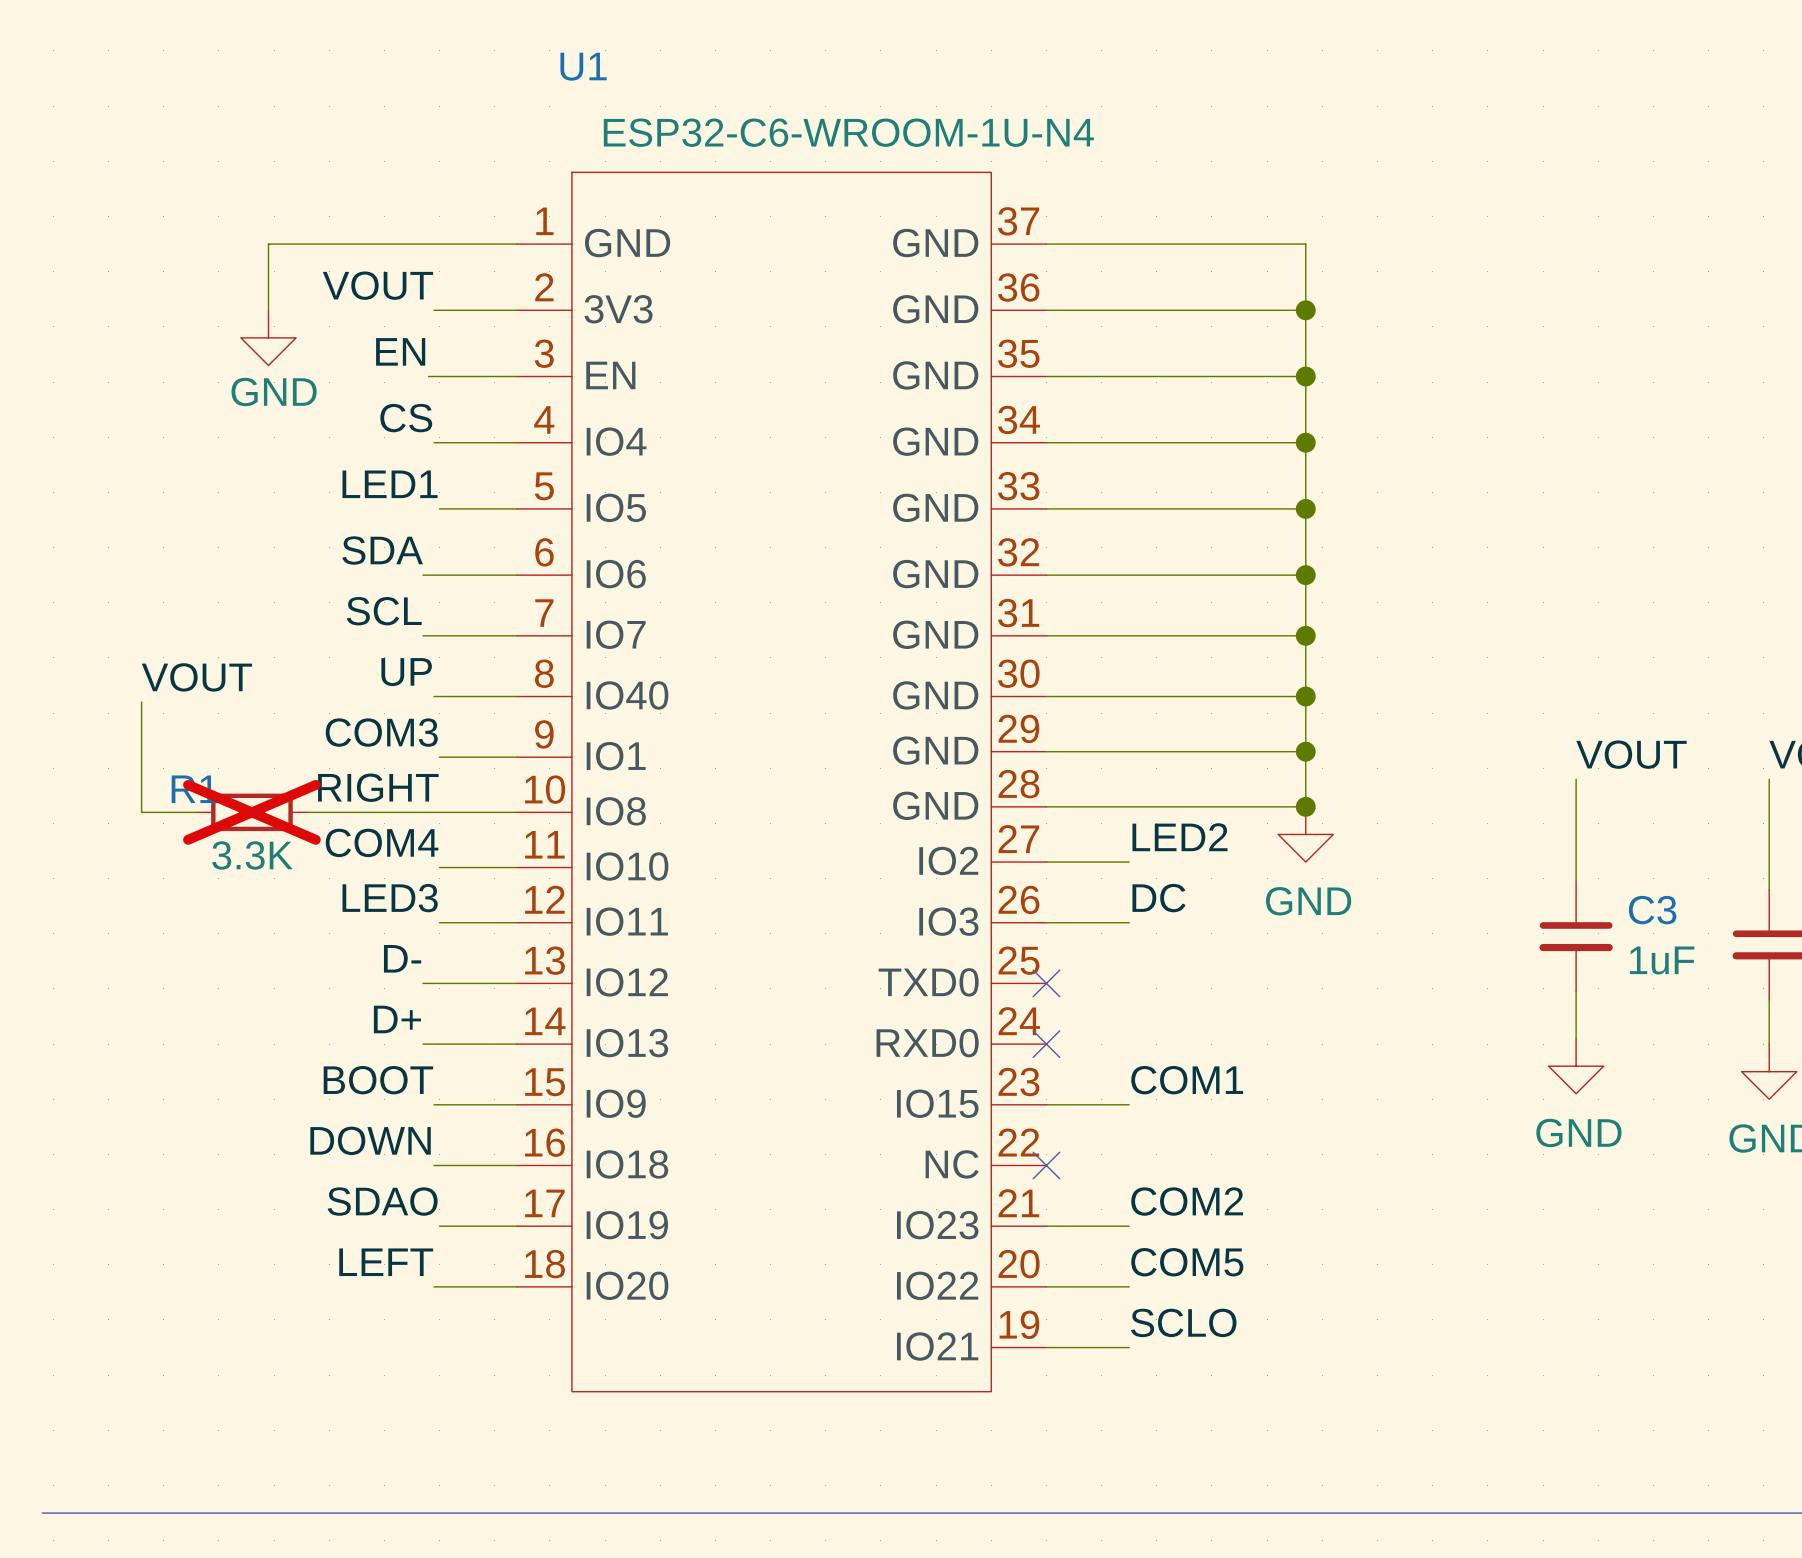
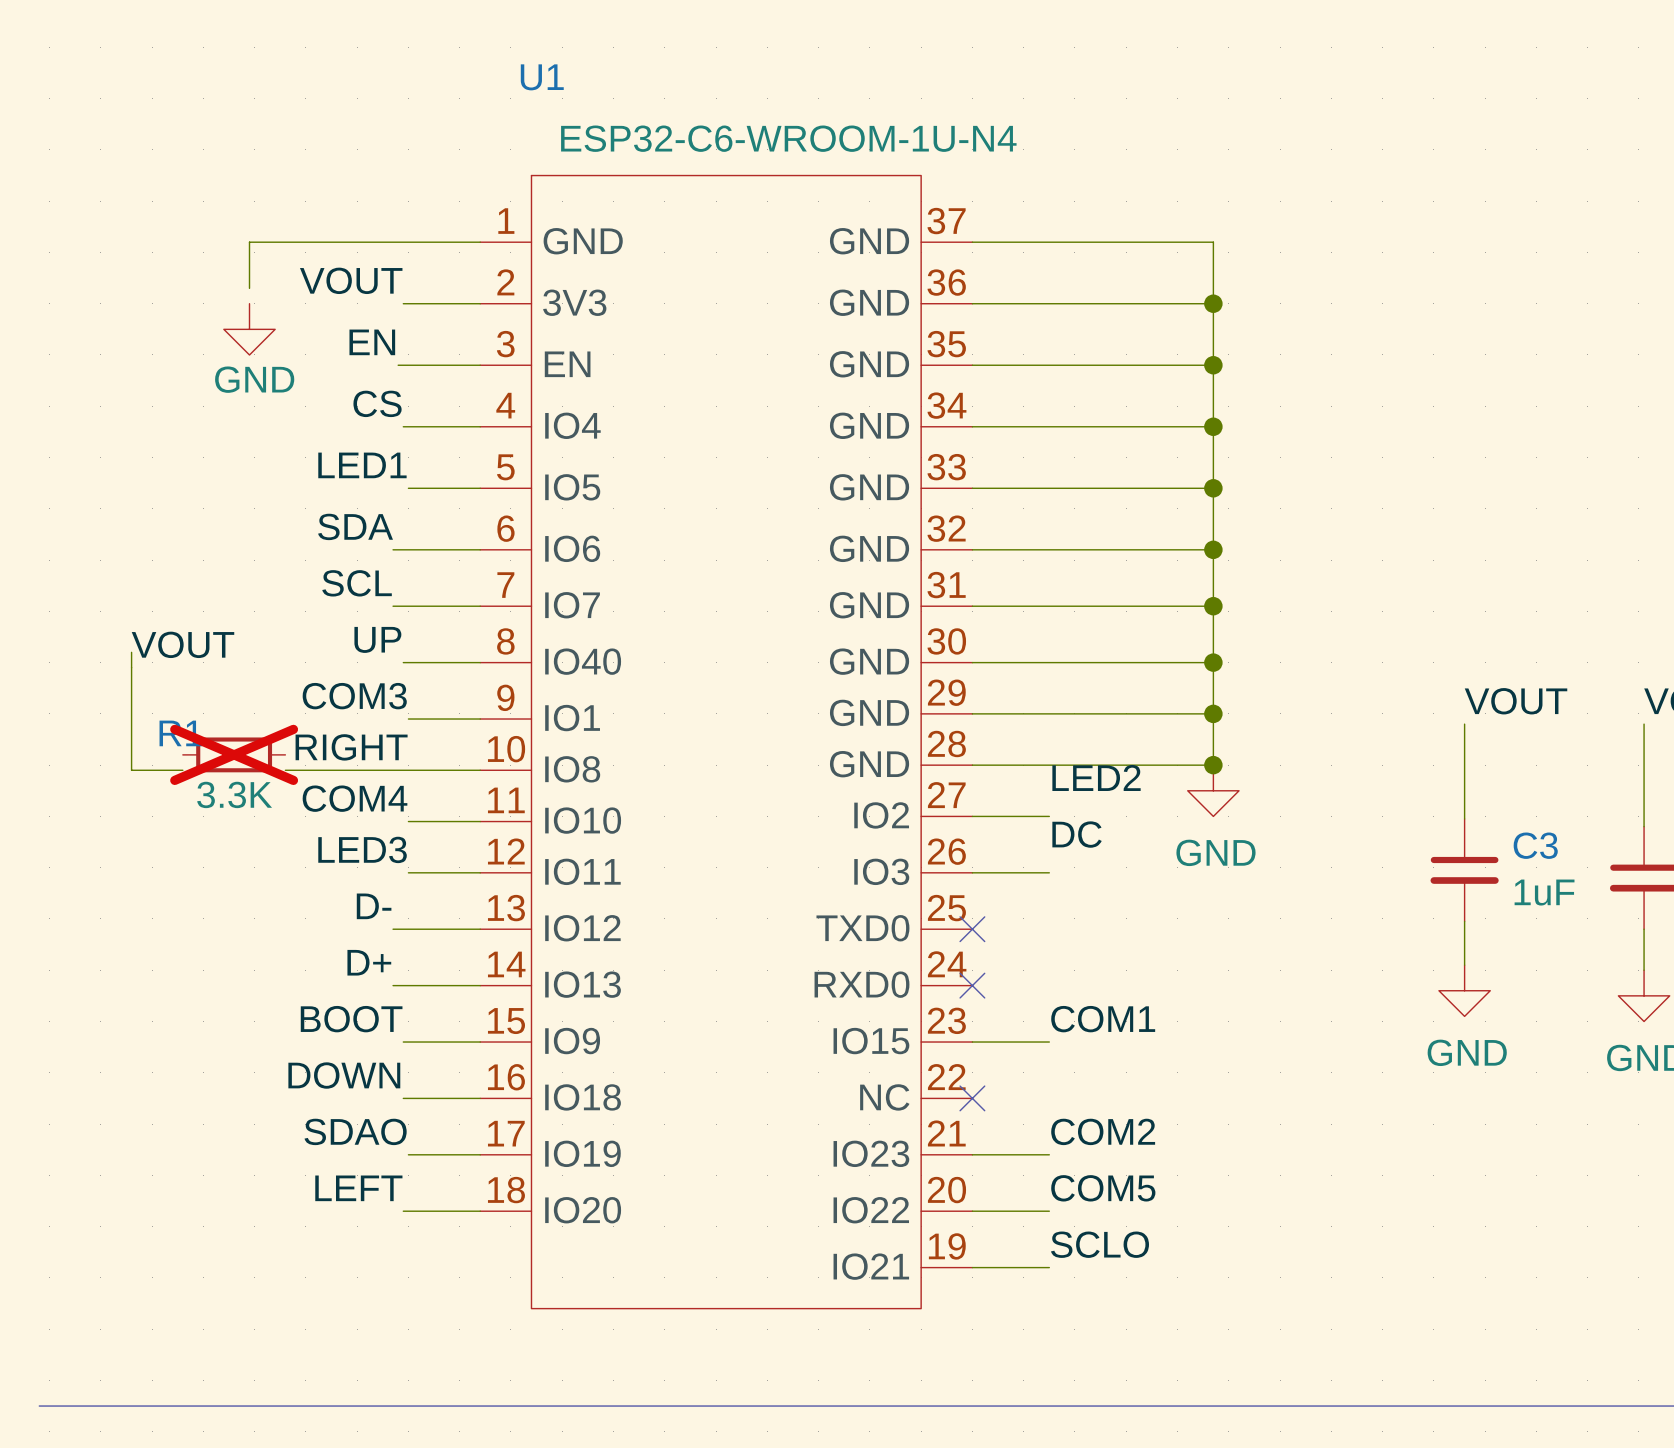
wire: (516, 244) (268, 244) (268, 260) -> (480, 242) (249, 242)
wire: (1046, 244) (1305, 244) (1305, 260) -> (972, 242) (1213, 242)
label position: VOUT (377, 285) -> VOUT (351, 280)
wire: (434, 310) (516, 310) -> (403, 303) (480, 303)
wire: (1046, 310) (1305, 310) -> (972, 303) (1213, 303)
junction position: (1305, 310) -> (1213, 303)
power symbol position: GND (268, 337) -> GND (249, 329)
label position: EN (400, 351) -> EN (372, 342)
wire: (428, 376) (516, 376) -> (398, 365) (480, 365)
wire: (1046, 376) (1305, 376) -> (972, 365) (1213, 365)
junction position: (1305, 376) -> (1213, 365)
label position: CS (406, 418) -> CS (377, 403)
wire: (434, 442) (516, 442) -> (403, 426) (480, 426)
wire: (1046, 442) (1305, 442) -> (972, 426) (1213, 426)
junction position: (1305, 442) -> (1213, 426)
label position: LED1 (390, 484) -> LED1 (362, 465)
wire: (439, 508) (516, 508) -> (408, 488) (480, 488)
wire: (1046, 508) (1305, 508) -> (972, 488) (1213, 488)
junction position: (1305, 508) -> (1213, 488)
label position: SDA (382, 550) -> SDA (355, 526)
wire: (422, 575) (516, 575) -> (393, 549) (480, 549)
wire: (1046, 575) (1305, 575) -> (972, 549) (1213, 549)
junction position: (1305, 575) -> (1213, 549)
label position: SCL (384, 611) -> SCL (357, 583)
wire: (422, 635) (516, 635) -> (393, 606) (480, 606)
wire: (1046, 635) (1305, 635) -> (972, 606) (1213, 606)
junction position: (1305, 635) -> (1213, 606)
label position: UP (406, 672) -> UP (377, 639)
label position: VOUT (196, 677) -> VOUT (182, 644)
wire: (434, 696) (516, 696) -> (403, 662) (480, 662)
wire: (1046, 696) (1305, 696) -> (972, 662) (1213, 662)
junction position: (1305, 696) -> (1213, 662)
label position: COM3 (381, 732) -> COM3 (354, 696)
wire: (1046, 751) (1305, 751) -> (972, 713) (1213, 713)
junction position: (1305, 751) -> (1213, 713)
wire: (439, 757) (516, 757) -> (408, 719) (480, 719)
U1 position: (781, 782) -> (726, 742)
label position: RIGHT (378, 787) -> RIGHT (351, 747)
wire: (1046, 806) (1305, 806) -> (972, 765) (1213, 765) (1213, 749)
junction position: (1305, 806) -> (1213, 765)
wire: (141, 812) (196, 812) -> (131, 754) (131, 770) (182, 770)
wire: (307, 812) (516, 812) -> (285, 770) (480, 770)
power symbol position: GND (1305, 834) -> GND (1213, 790)
label position: COM4 (382, 842) -> COM4 (355, 798)
wire: (1046, 862) (1129, 862) -> (972, 816) (1049, 816)
wire: (439, 867) (516, 867) -> (408, 821) (480, 821)
label position: LED3 (390, 898) -> LED3 (362, 849)
wire: (439, 922) (516, 922) -> (408, 872) (480, 872)
wire: (1046, 922) (1129, 922) -> (972, 872) (1049, 872)
label position: D- (402, 958) -> D- (374, 906)
wire: (422, 983) (516, 983) -> (393, 929) (480, 929)
no-connect mark position: (1046, 983) -> (972, 929)
label position: D+ (397, 1019) -> D+ (369, 962)
wire: (422, 1044) (516, 1044) -> (393, 985) (480, 985)
no-connect mark position: (1046, 1044) -> (972, 985)
label position: BOOT (378, 1080) -> BOOT (351, 1019)
label position: COM1 (1187, 1080) -> COM1 (1103, 1019)
wire: (434, 1104) (516, 1104) -> (403, 1042) (480, 1042)
wire: (1046, 1104) (1129, 1104) -> (972, 1042) (1049, 1042)
label position: DOWN (370, 1140) -> DOWN (344, 1075)
wire: (434, 1165) (516, 1165) -> (403, 1098) (480, 1098)
no-connect mark position: (1046, 1165) -> (972, 1098)
label position: SDAO (382, 1201) -> SDAO (355, 1131)
label position: COM2 (1187, 1201) -> COM2 (1103, 1131)
wire: (439, 1226) (516, 1226) -> (408, 1154) (480, 1154)
wire: (1046, 1226) (1129, 1226) -> (972, 1154) (1049, 1154)
label position: LEFT (386, 1262) -> LEFT (358, 1188)
label position: COM5 (1187, 1262) -> COM5 (1103, 1188)
wire: (434, 1286) (516, 1286) -> (403, 1211) (480, 1211)
wire: (1046, 1286) (1129, 1286) -> (972, 1211) (1049, 1211)
label position: SCLO (1183, 1322) -> SCLO (1100, 1244)
wire: (1046, 1347) (1129, 1347) -> (972, 1267) (1049, 1267)

